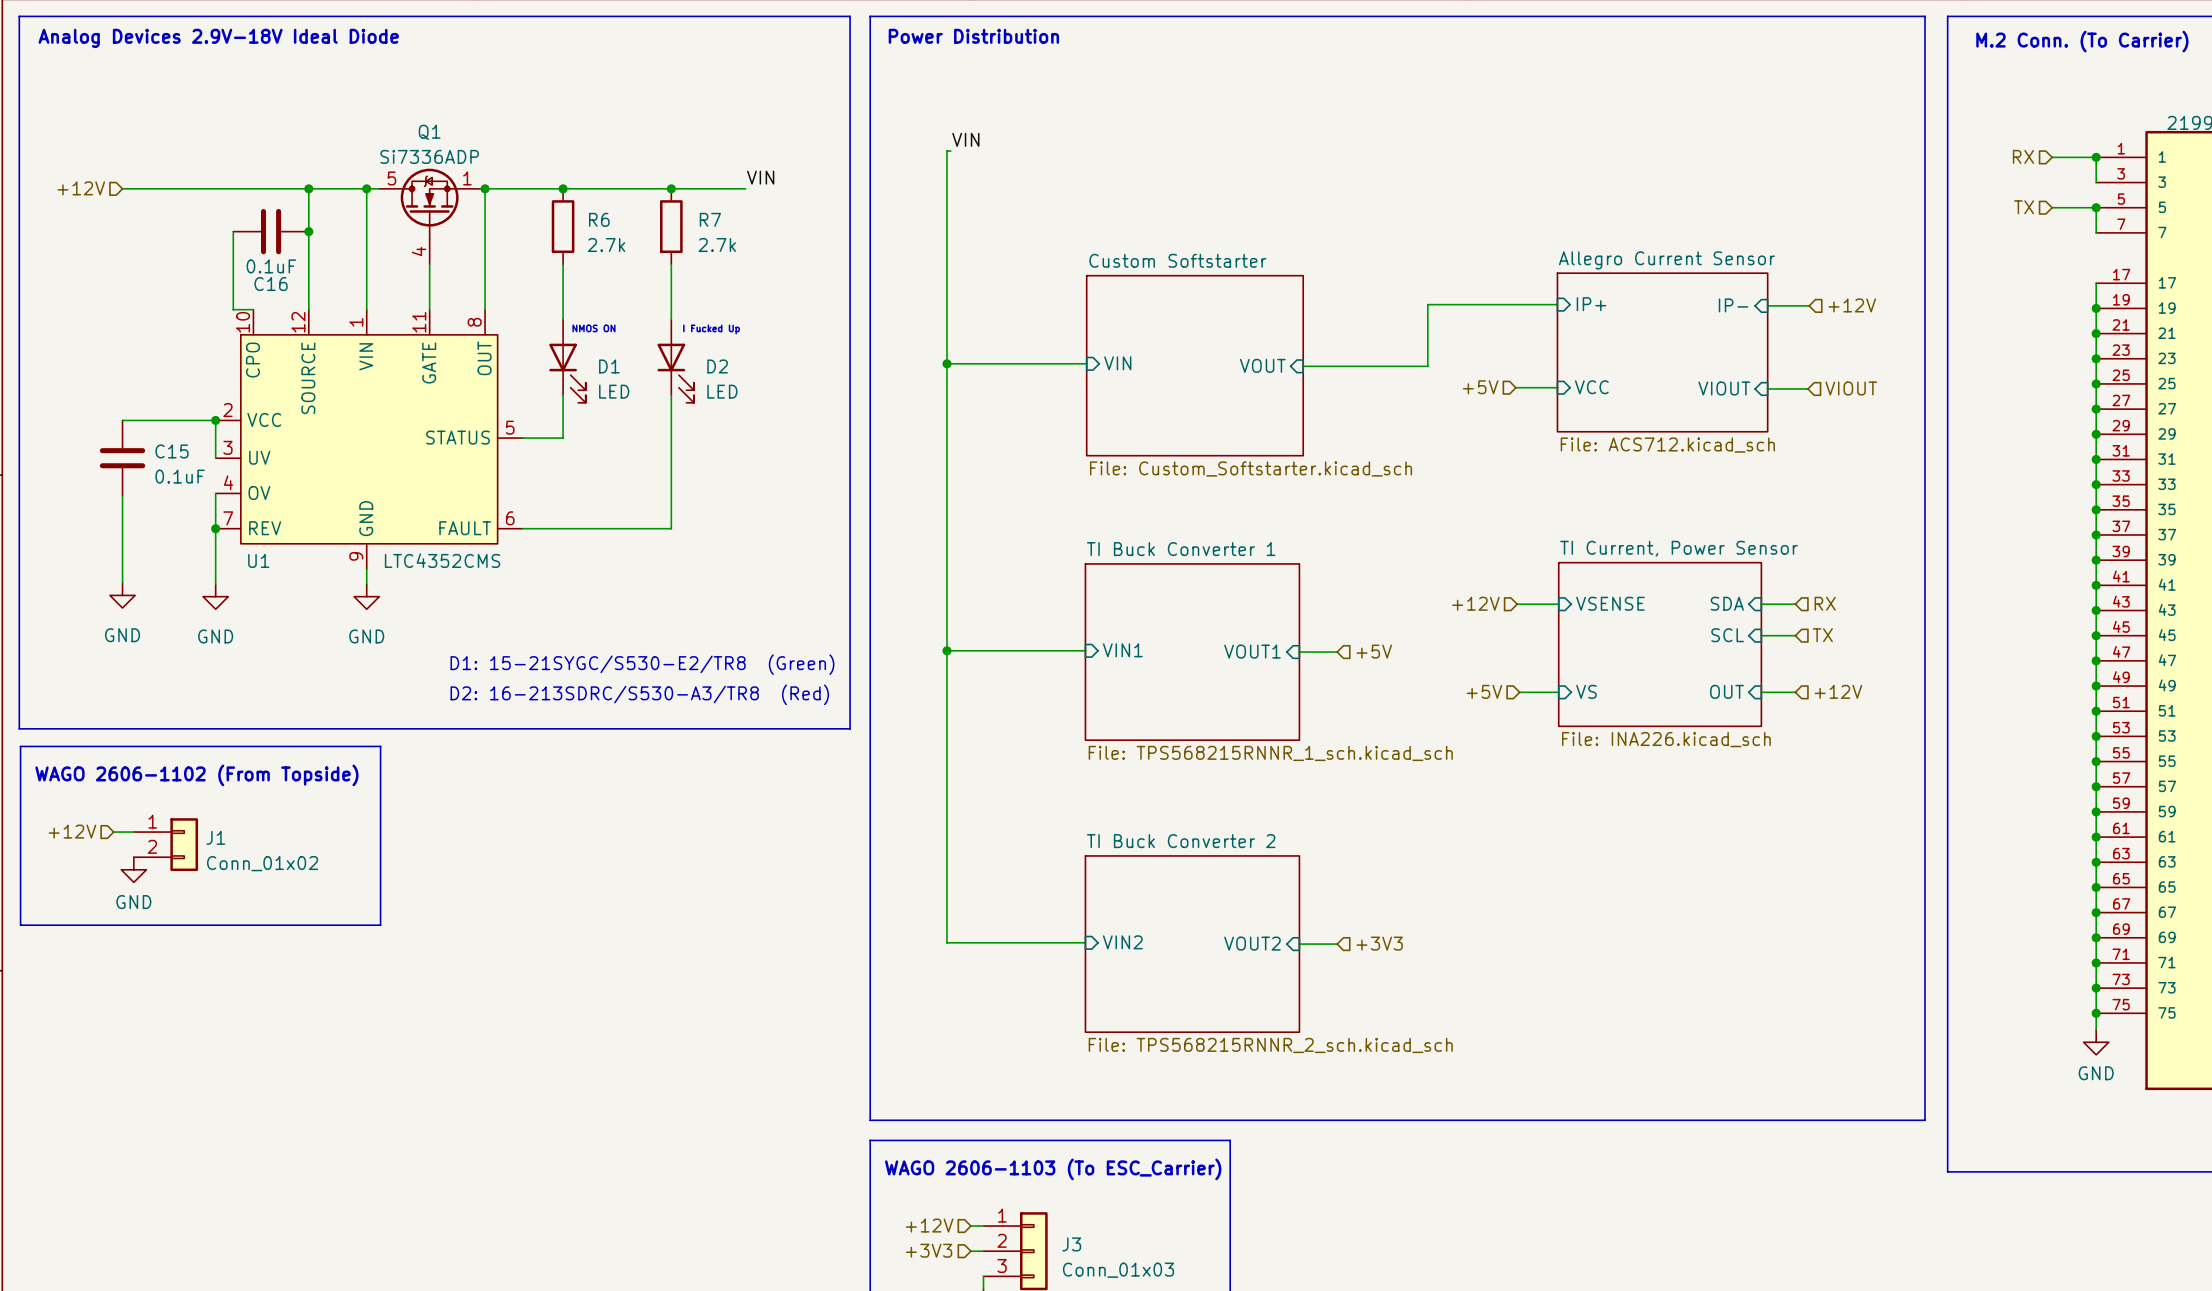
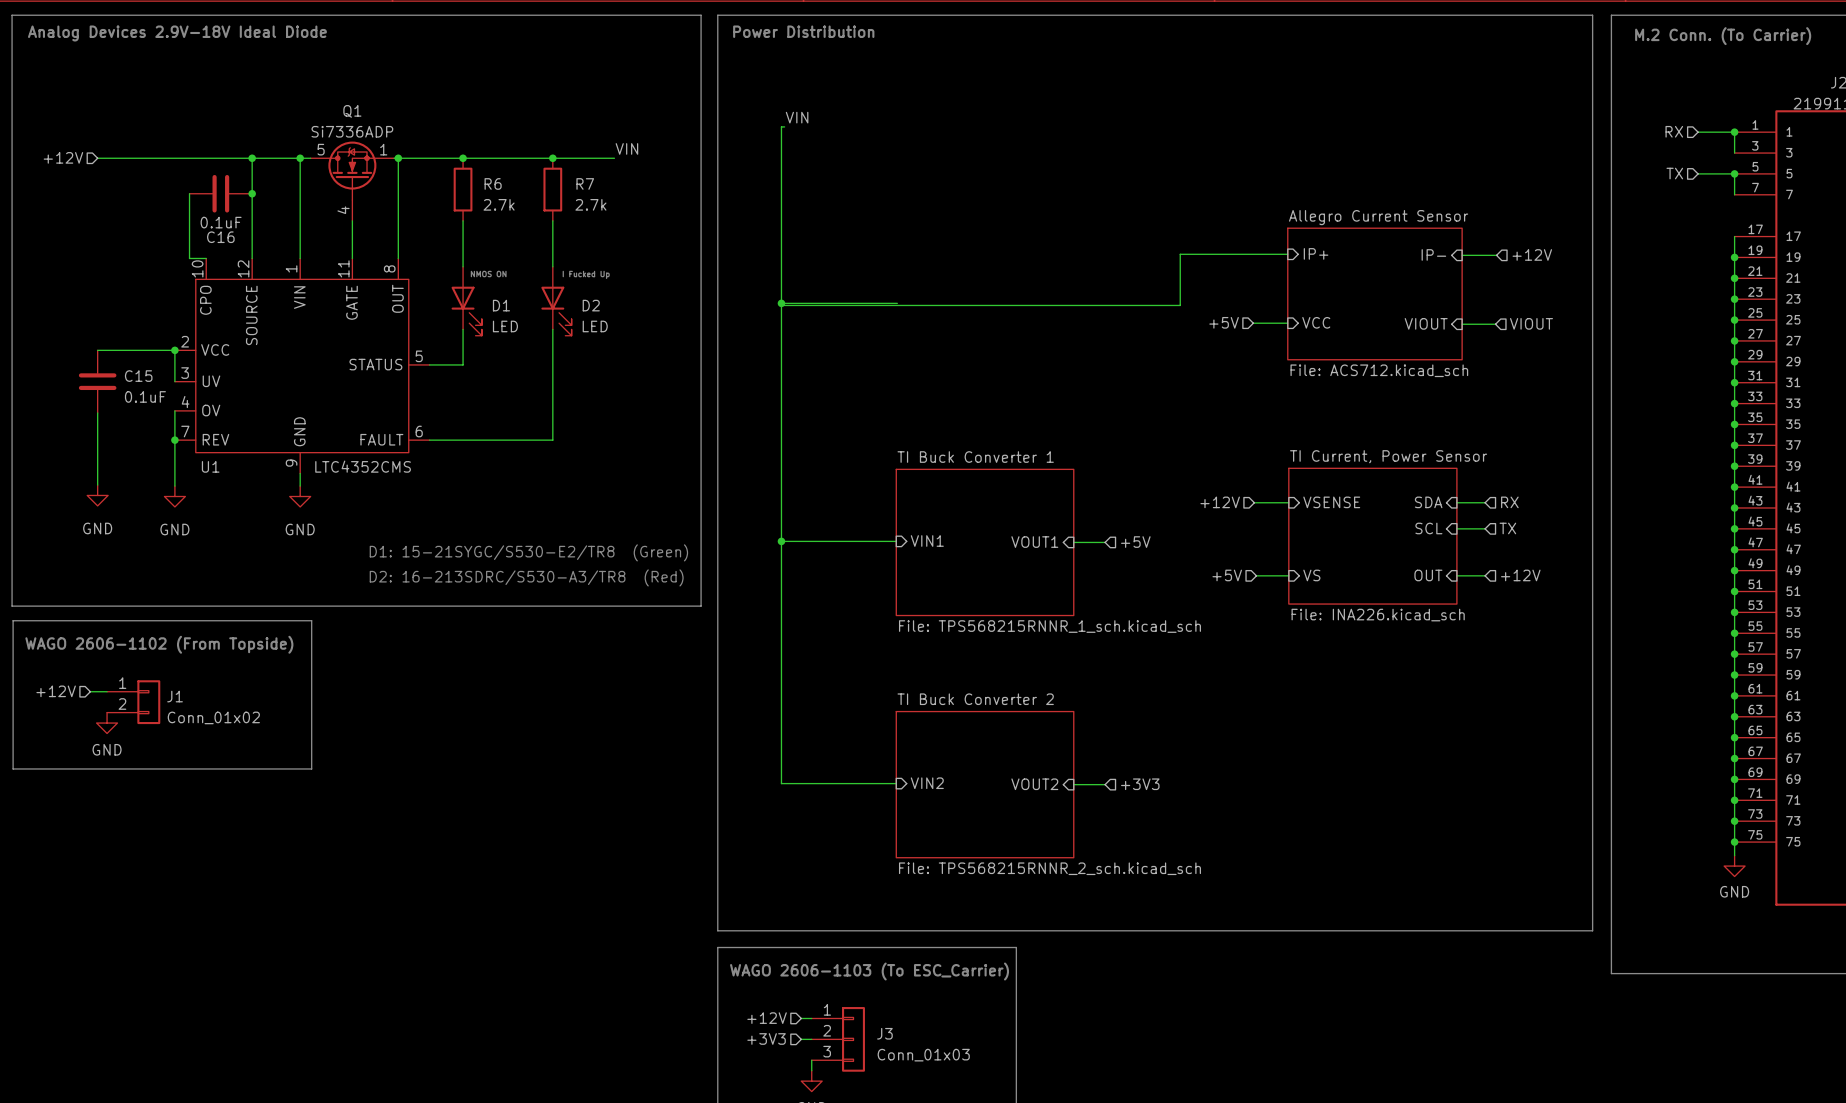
sheet pin: VIN (1117, 363) -> none
sheet Custom Softstarter: File: Custom_Softstarter.kicad_sch (1194, 365) -> none
sheet pin: VOUT (1262, 365) -> none
wire: none -> (781, 305) (1076, 305)

